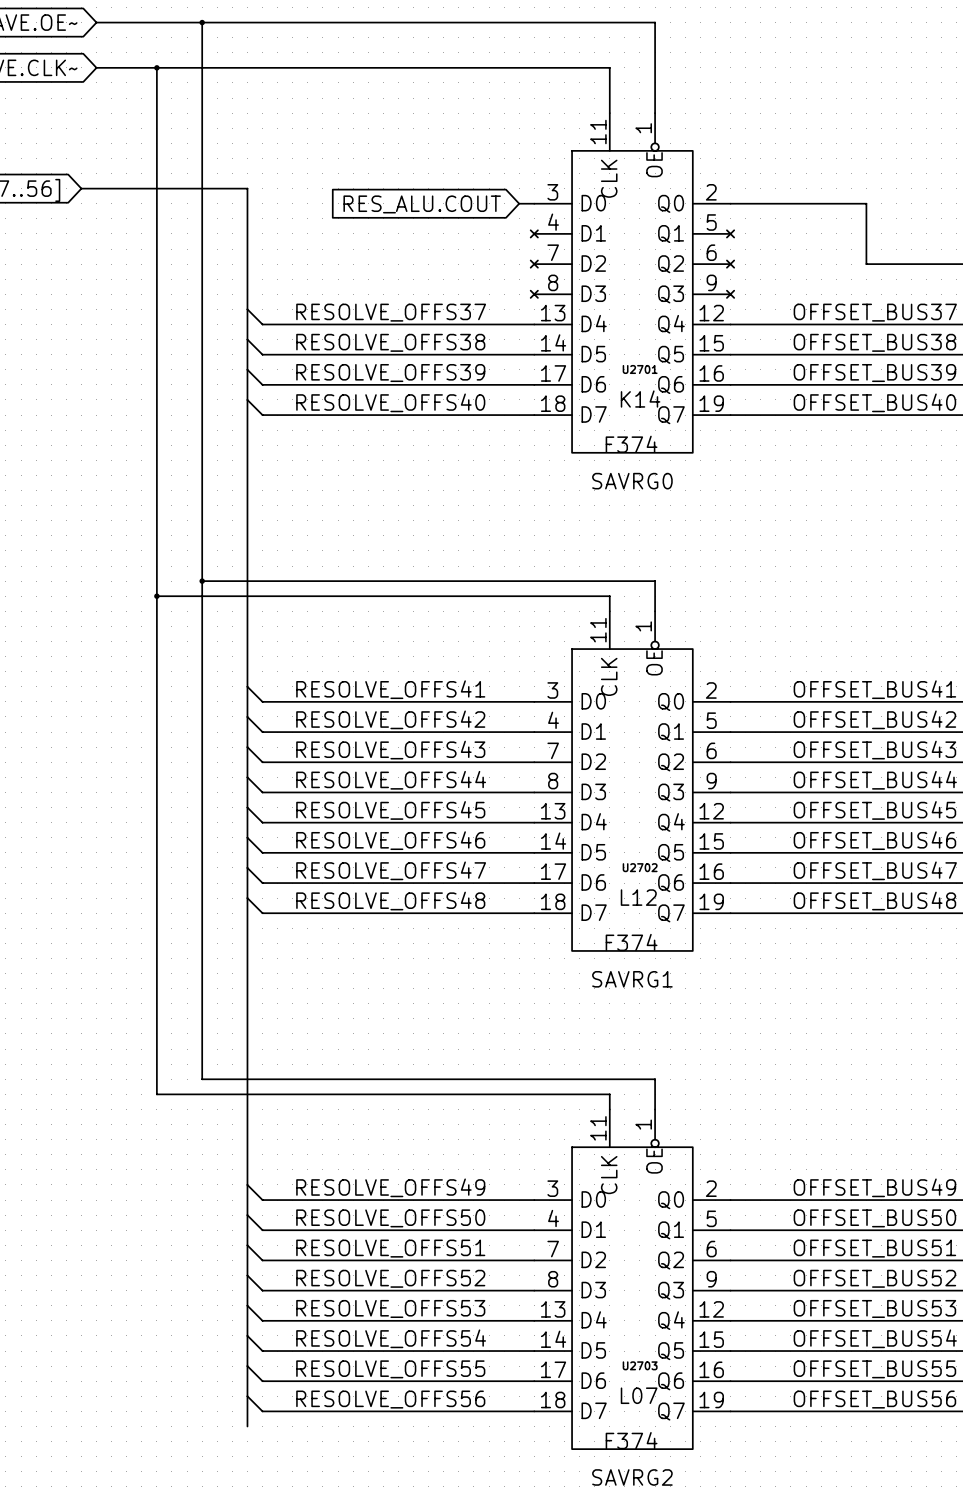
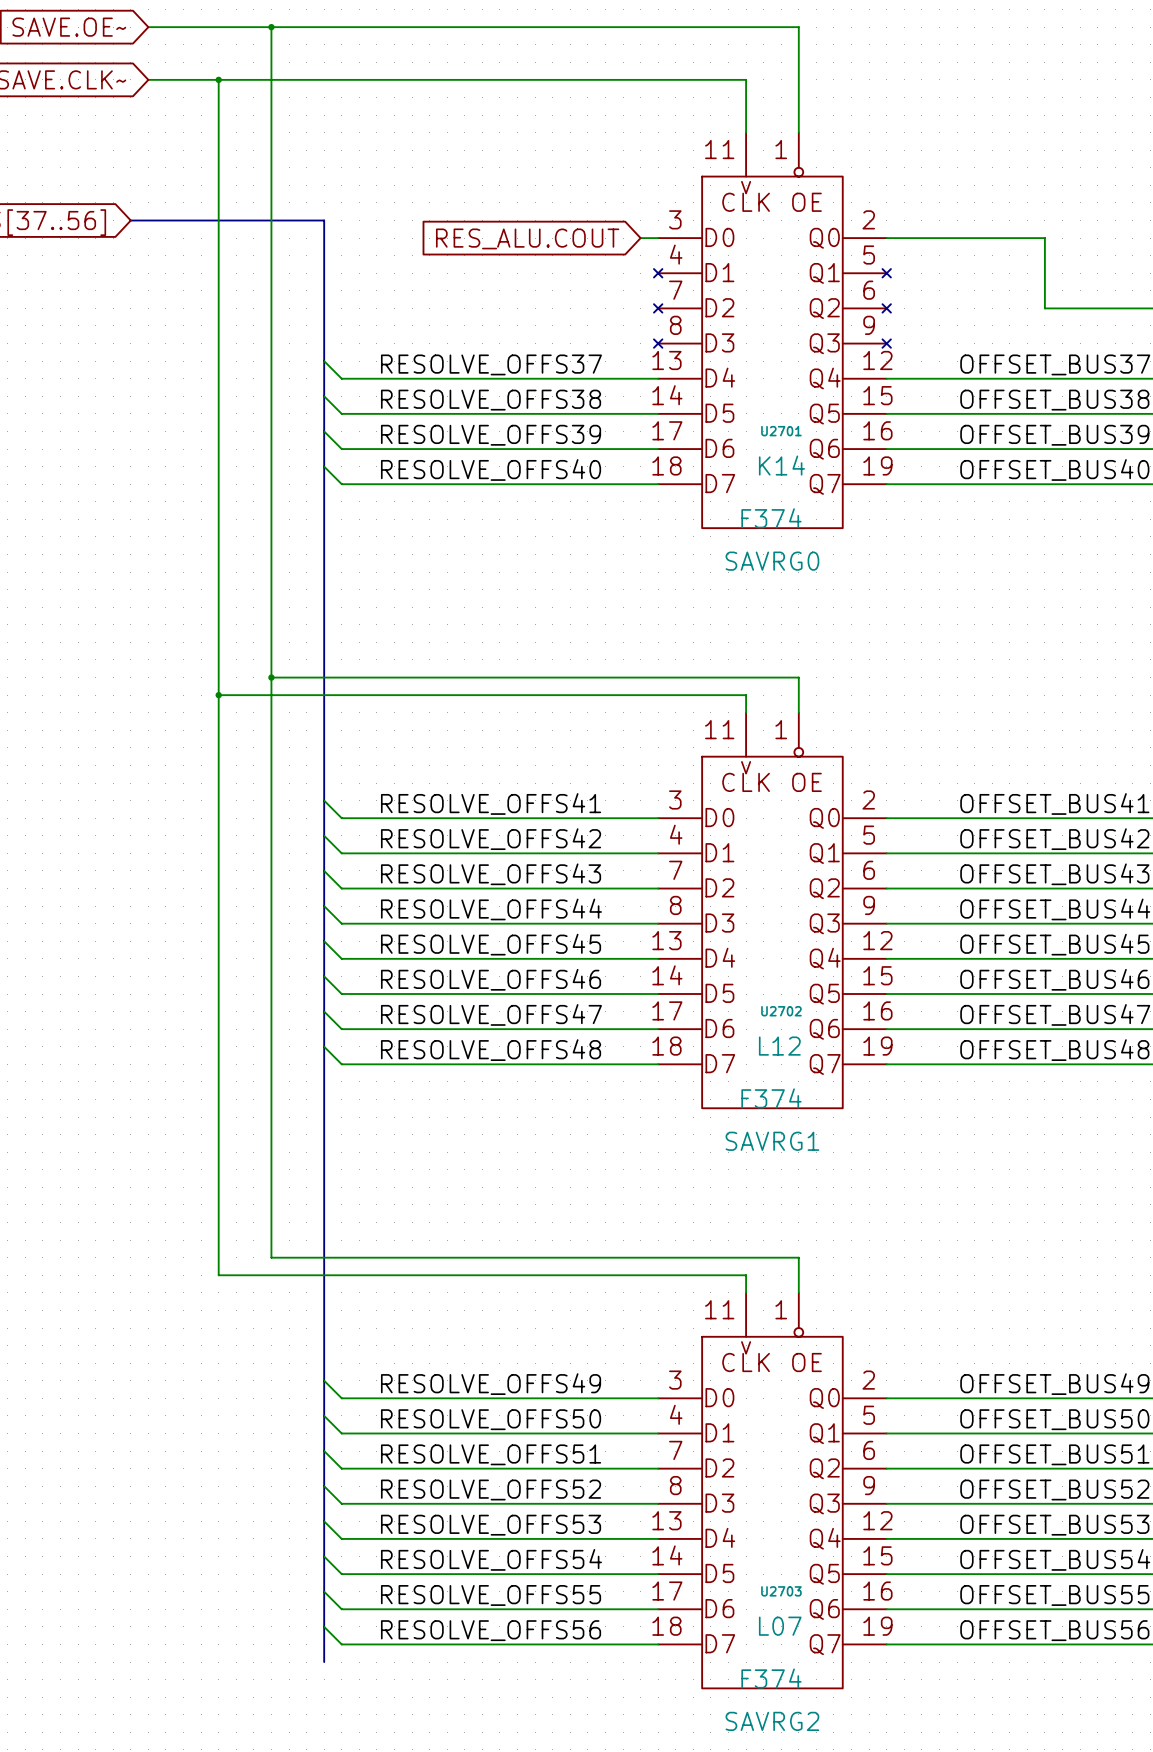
U2701 symbol: [534, 113, 731, 453] -> [658, 132, 887, 529]
U2702 symbol: [534, 611, 731, 951] -> [658, 712, 887, 1109]
U2703 symbol: [534, 1109, 731, 1450] -> [658, 1292, 887, 1689]

